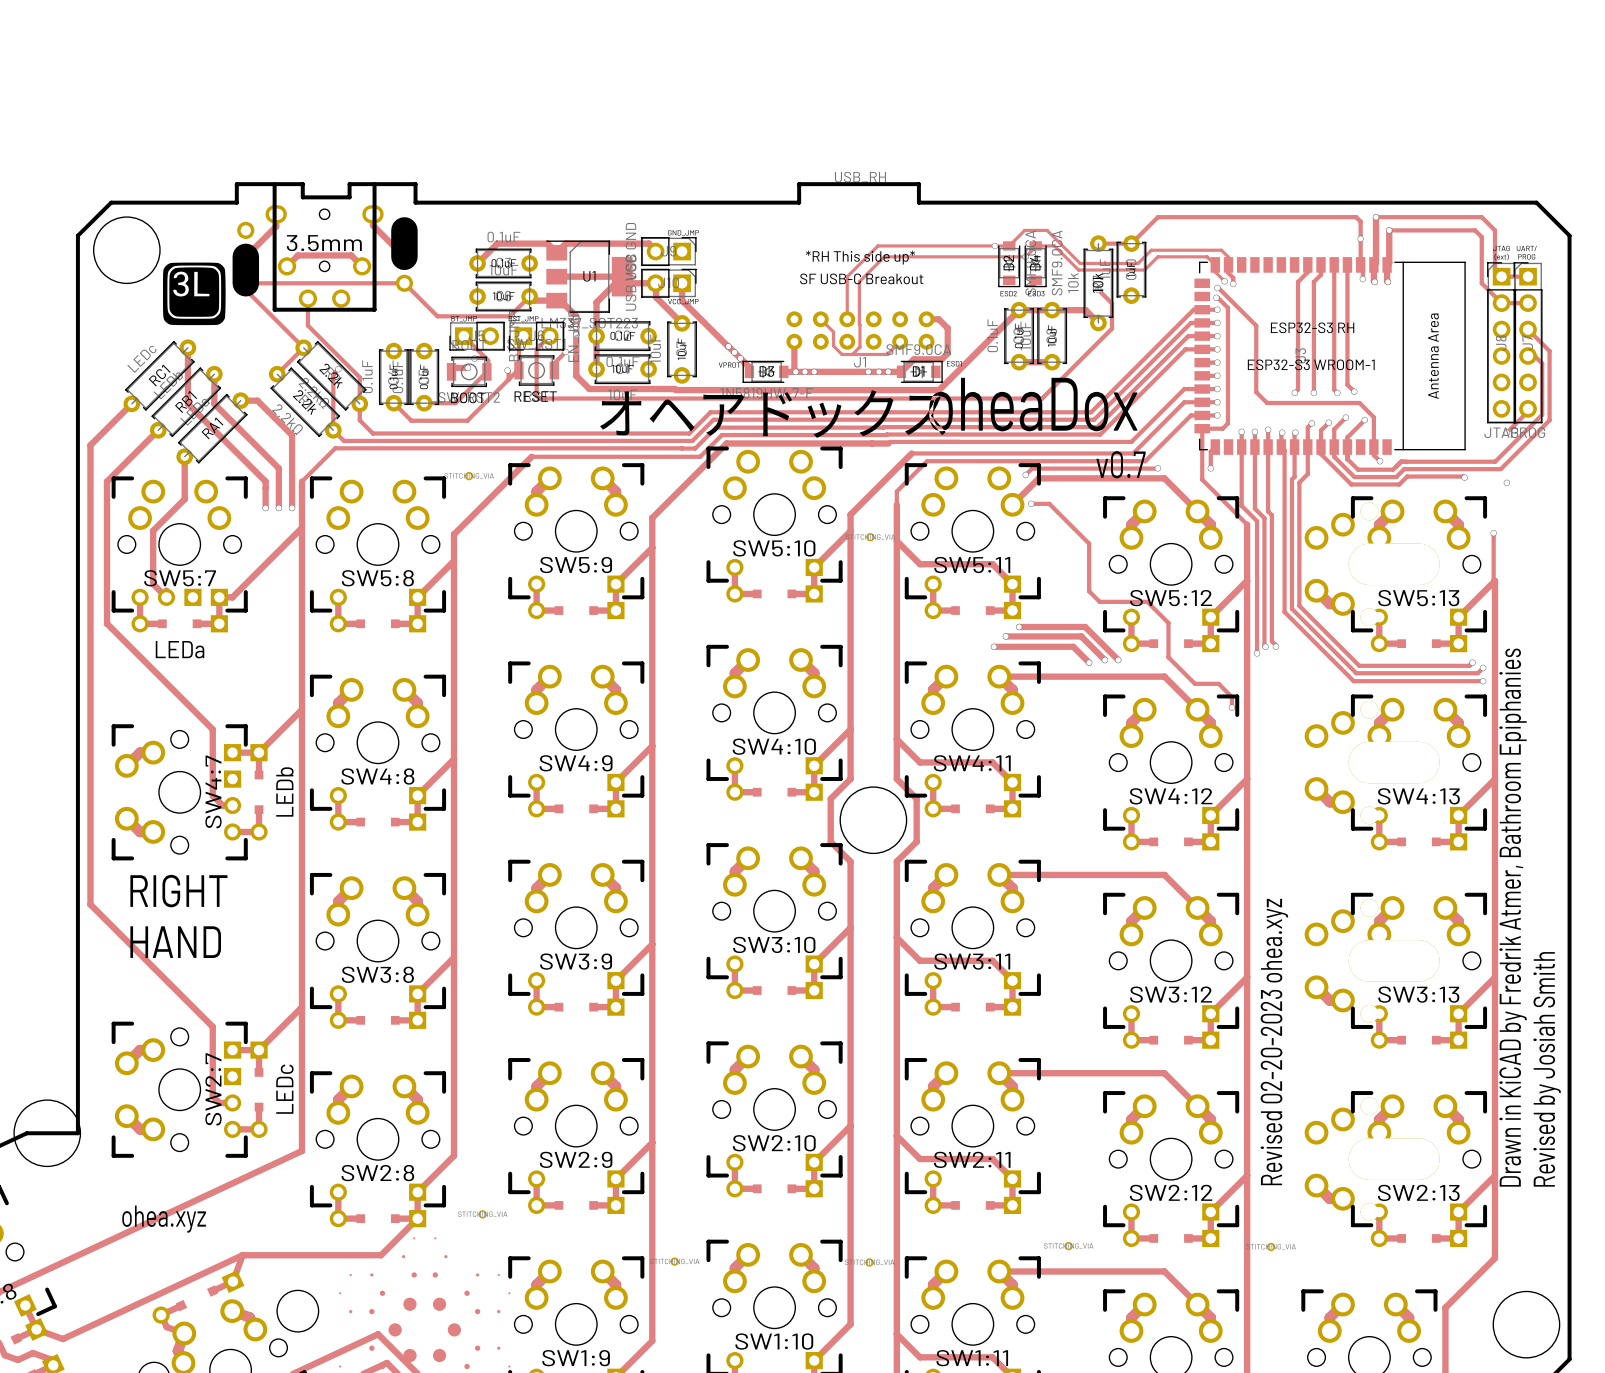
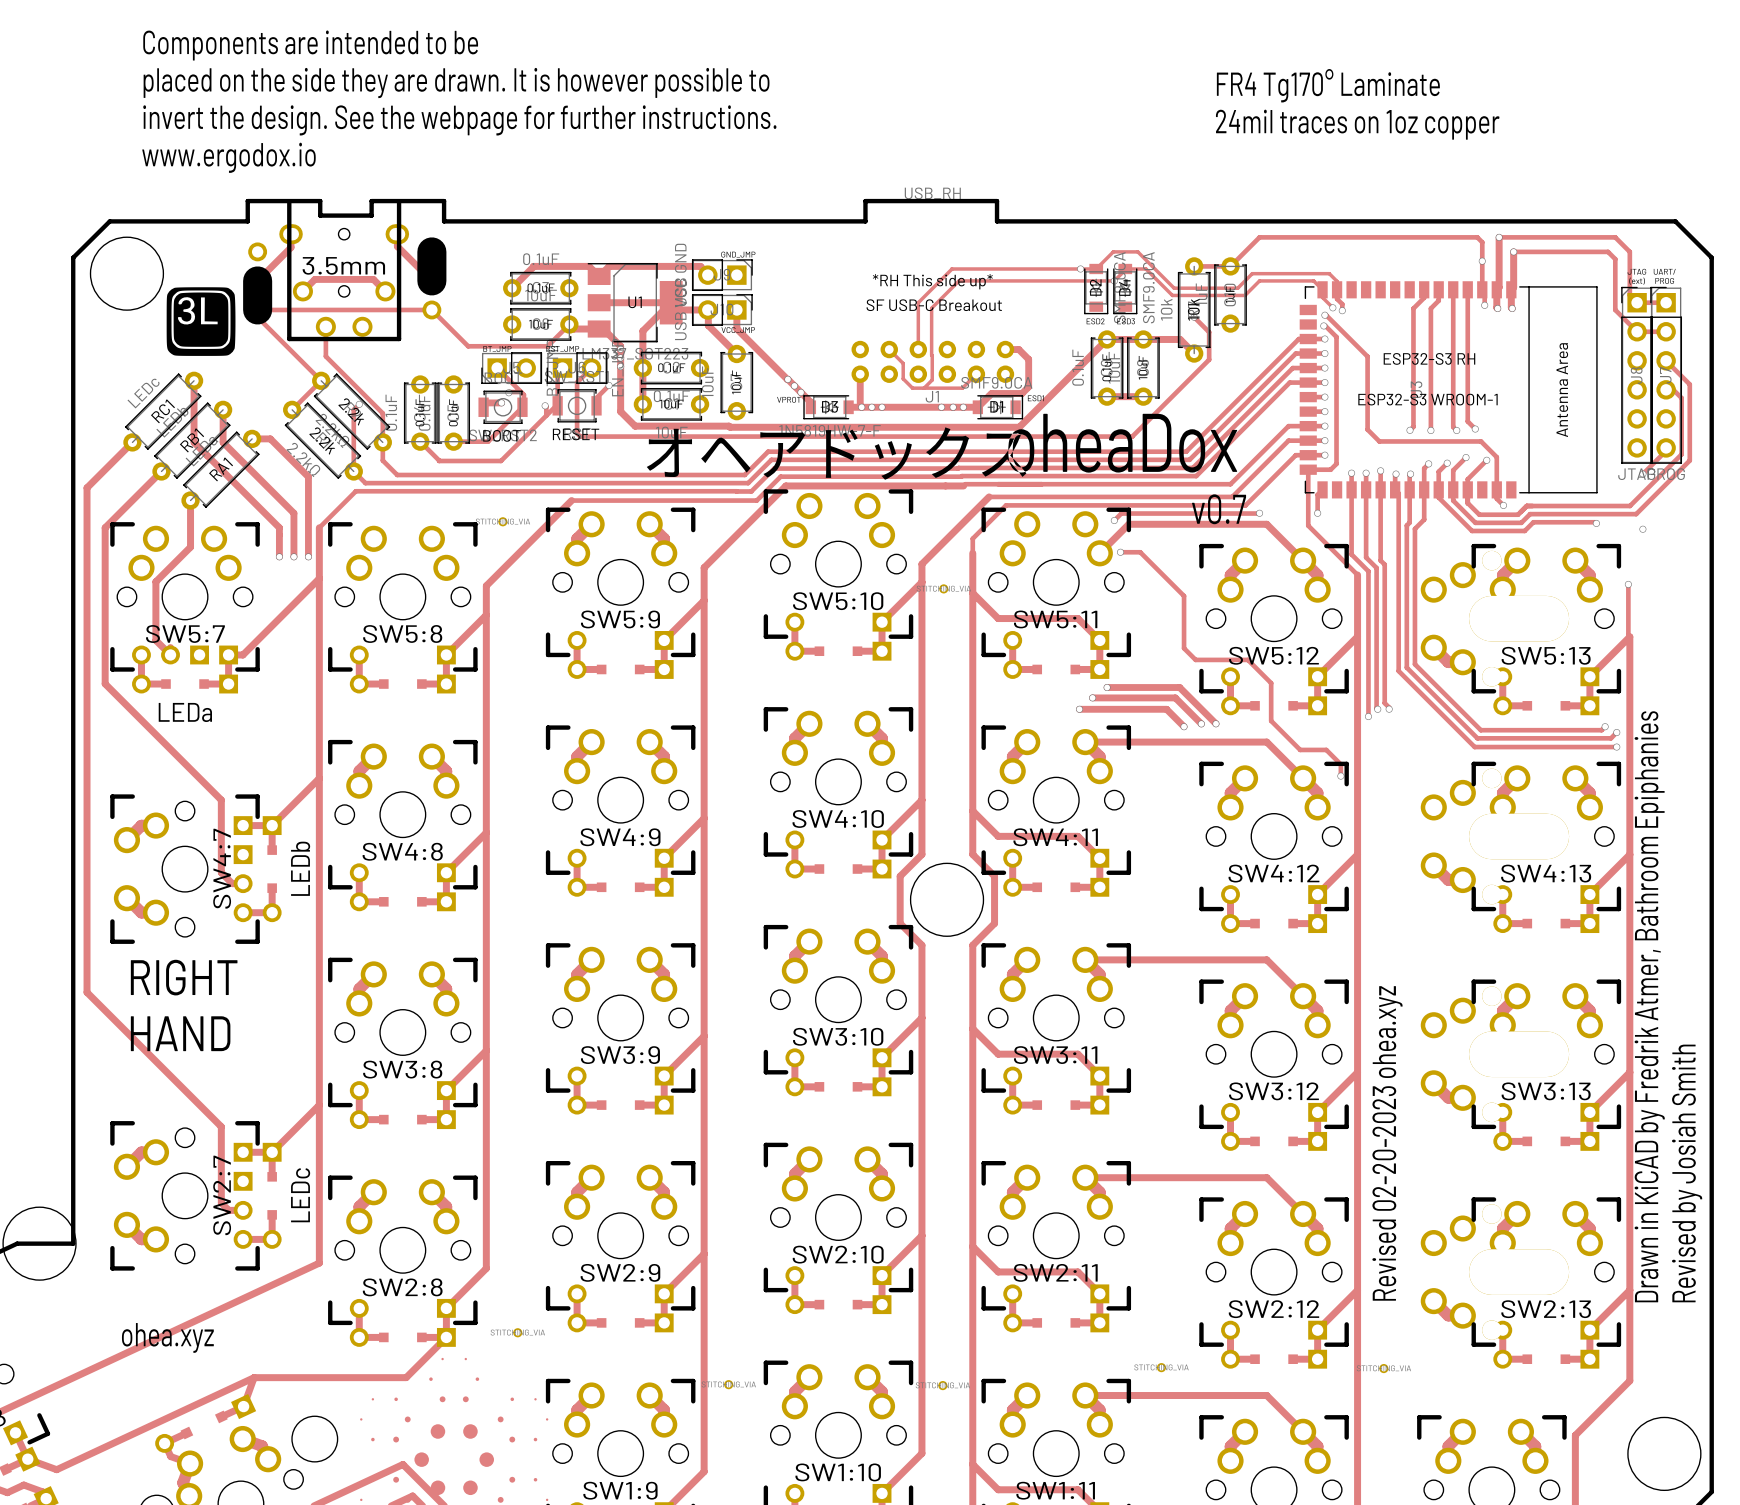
text: none -> Components are intended to be (310, 45)
text: none -> placed on the side they are drawn. It is however possible to (456, 83)
text: none -> FR4 Tg170° Laminate (1328, 85)
text: none -> invert the design. See the webpage for further instructions. (459, 120)
text: none -> 24mil traces on 1oz copper (1357, 124)
text: none -> www.ergodox.io (228, 157)

